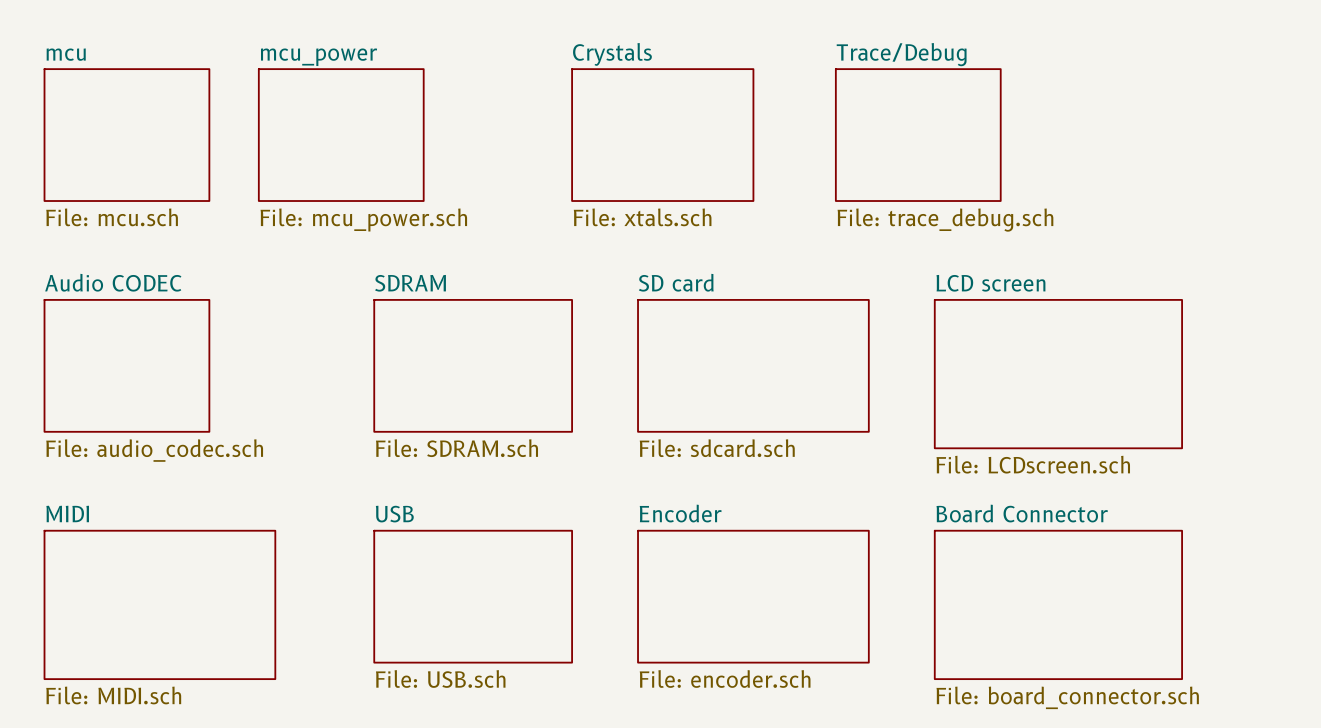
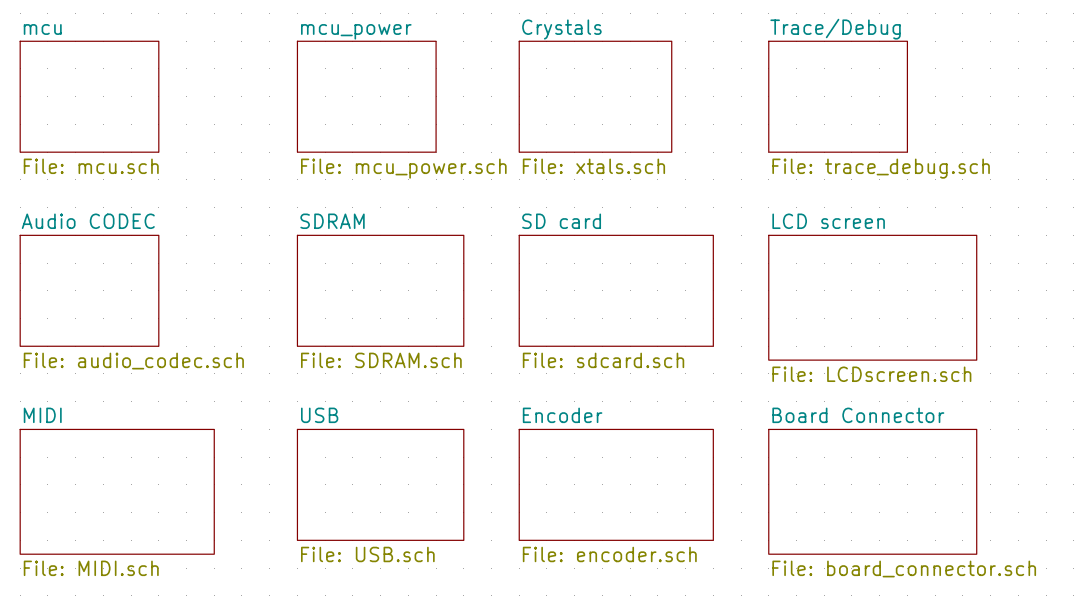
sheet mcu_power position: (341, 135) -> (366, 96)
sheet Crystals position: (662, 135) -> (595, 96)
sheet Trace/Debug position: (918, 135) -> (838, 96)

